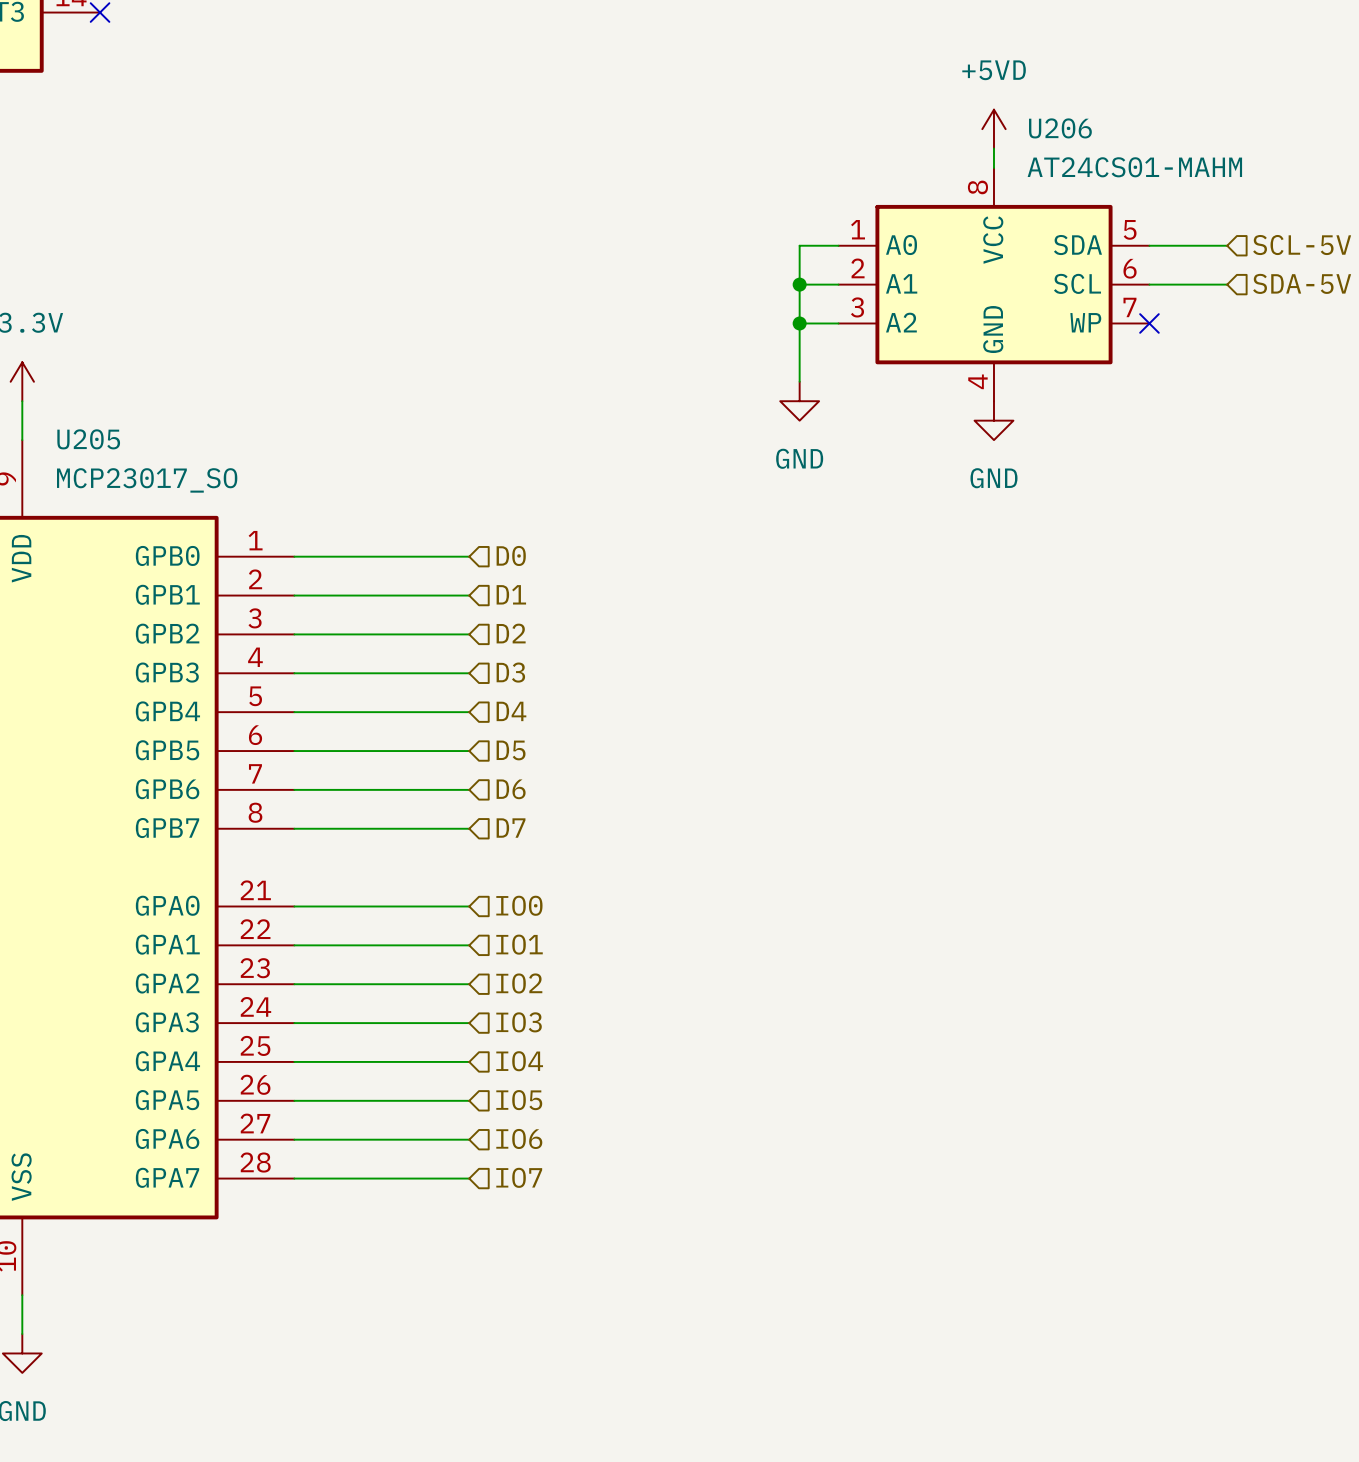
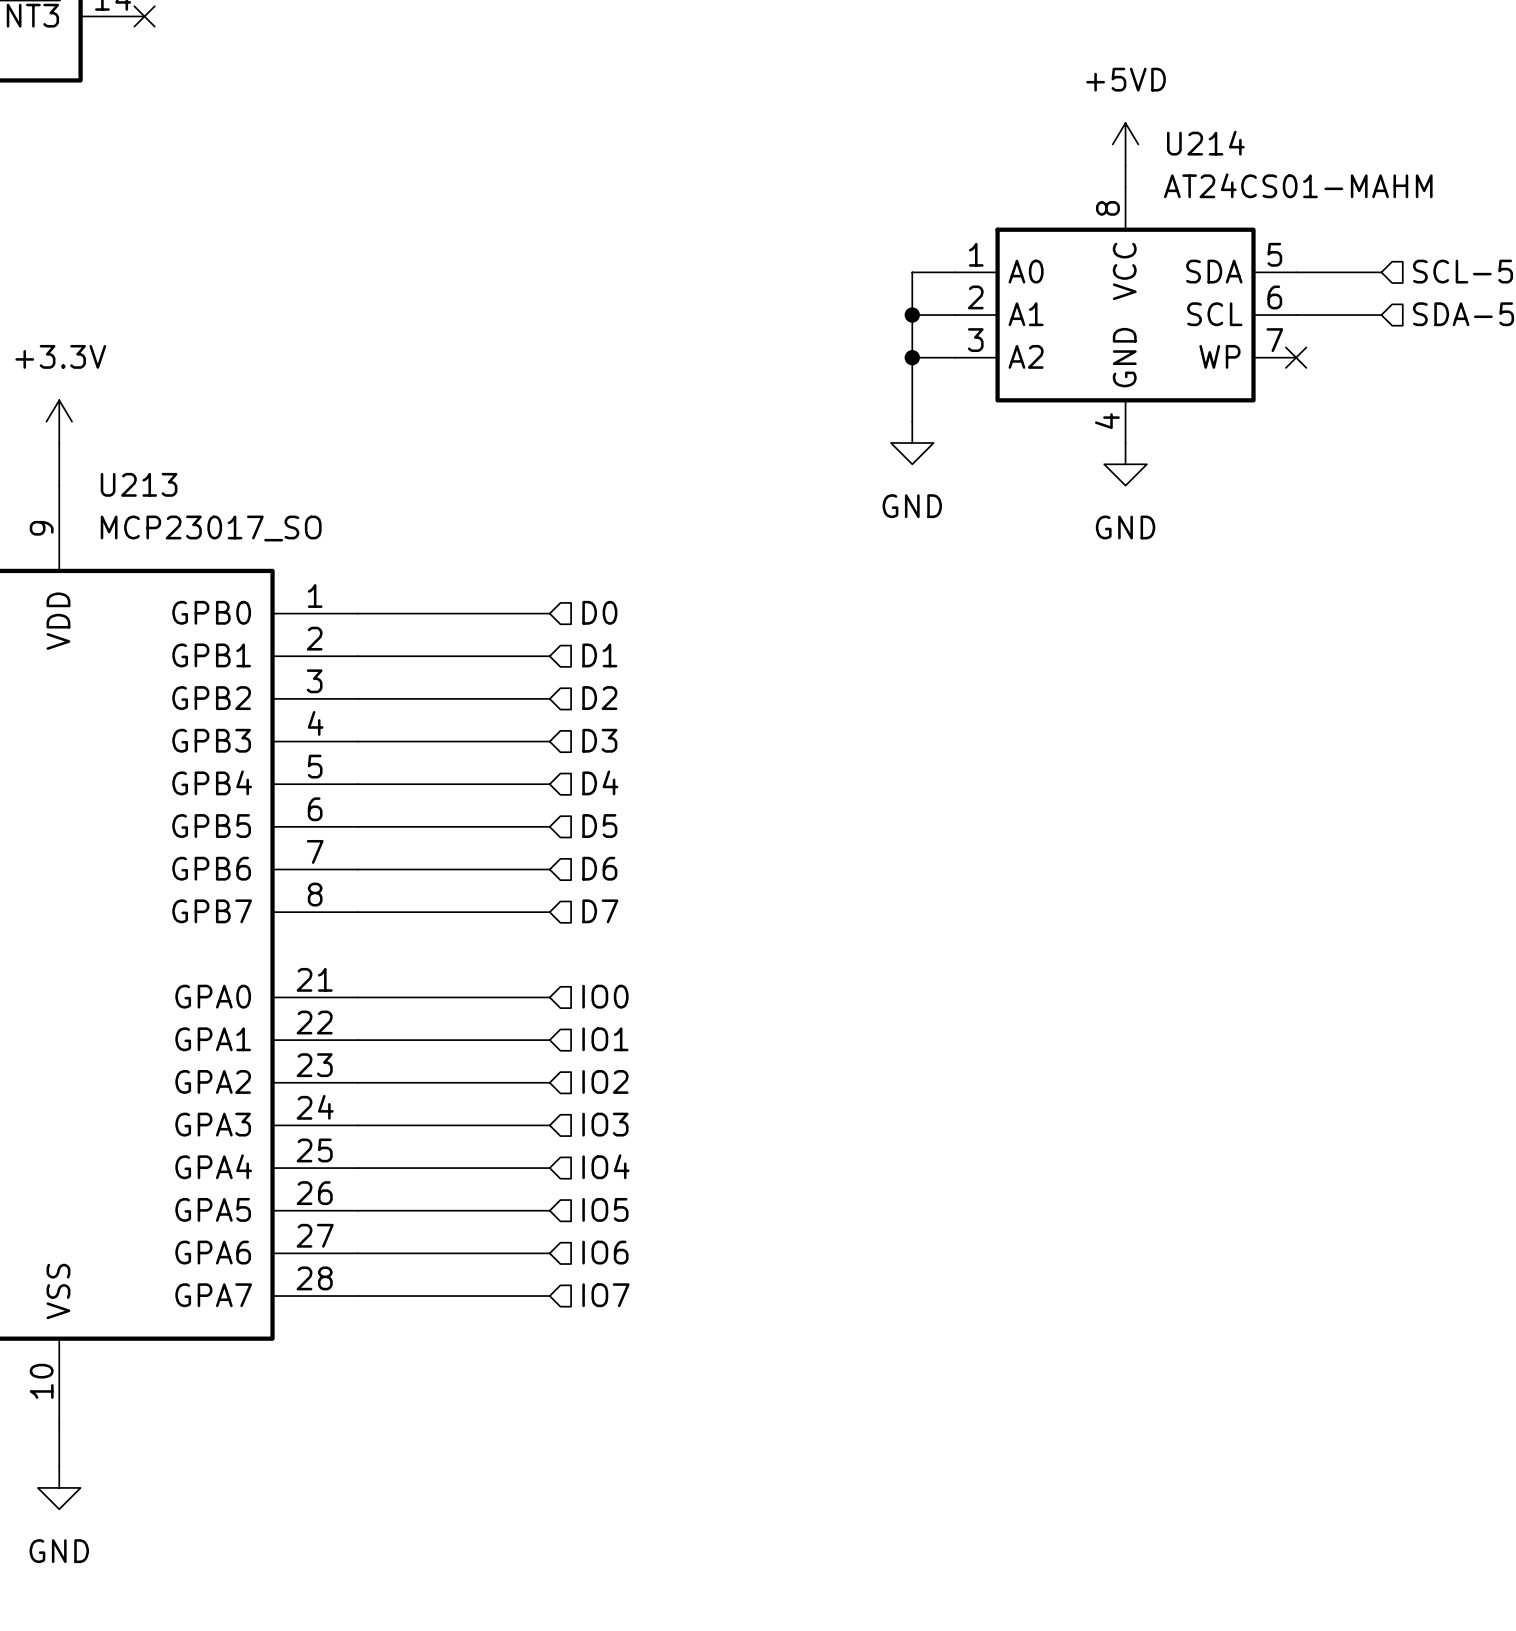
U206 name: U206 (1060, 128) -> U214 (1205, 143)
U205 name: U205 (88, 439) -> U213 (139, 484)

